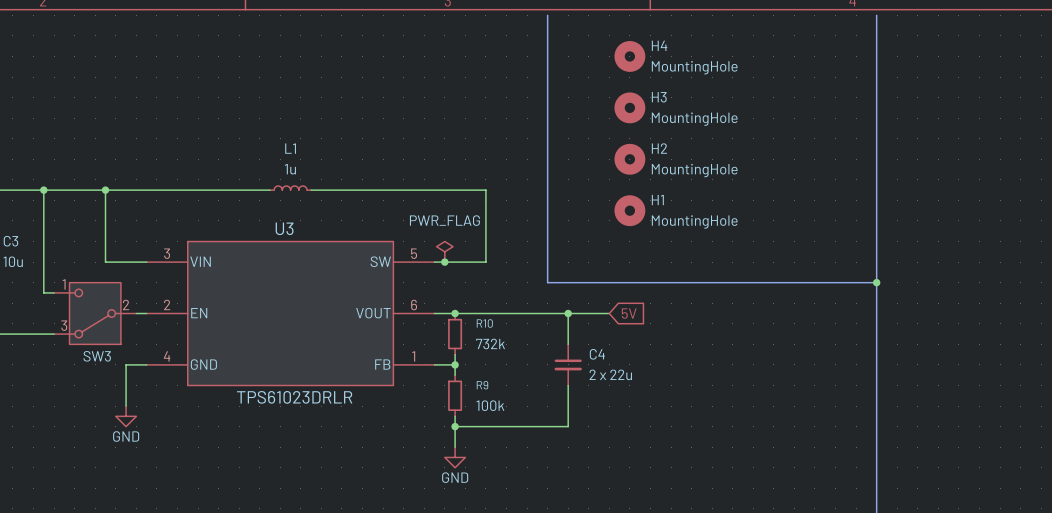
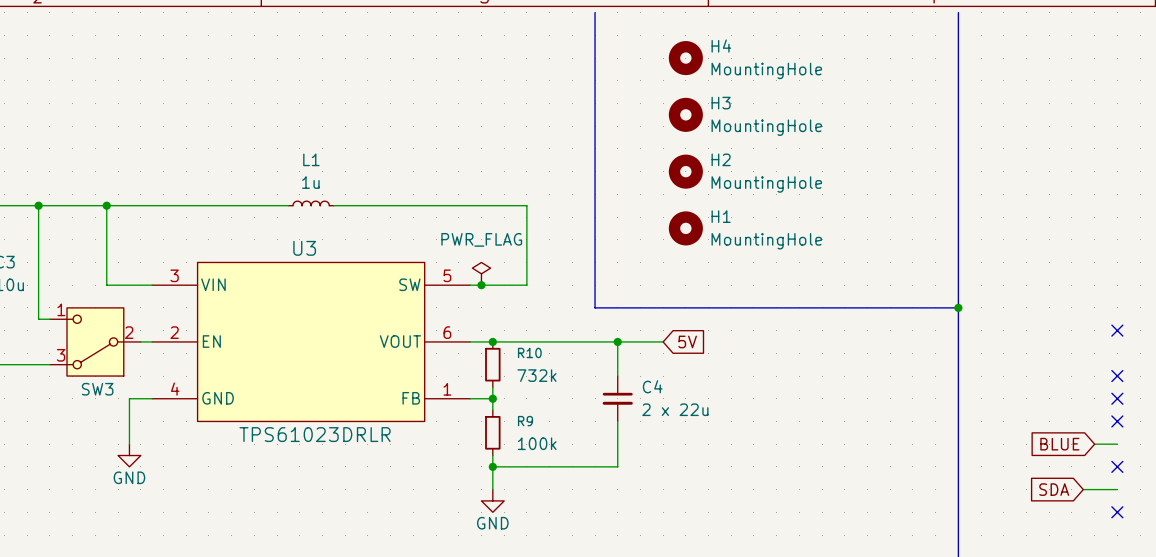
no-connect mark: none -> (1117, 330)
no-connect mark: none -> (1117, 376)
no-connect mark: none -> (1117, 398)
no-connect mark: none -> (1117, 421)
global label: none -> BLUE (1059, 444)
wire: none -> (1094, 444) (1117, 444)
no-connect mark: none -> (1117, 466)
global label: none -> SDA (1054, 489)
wire: none -> (1083, 489) (1117, 489)
no-connect mark: none -> (1117, 512)

